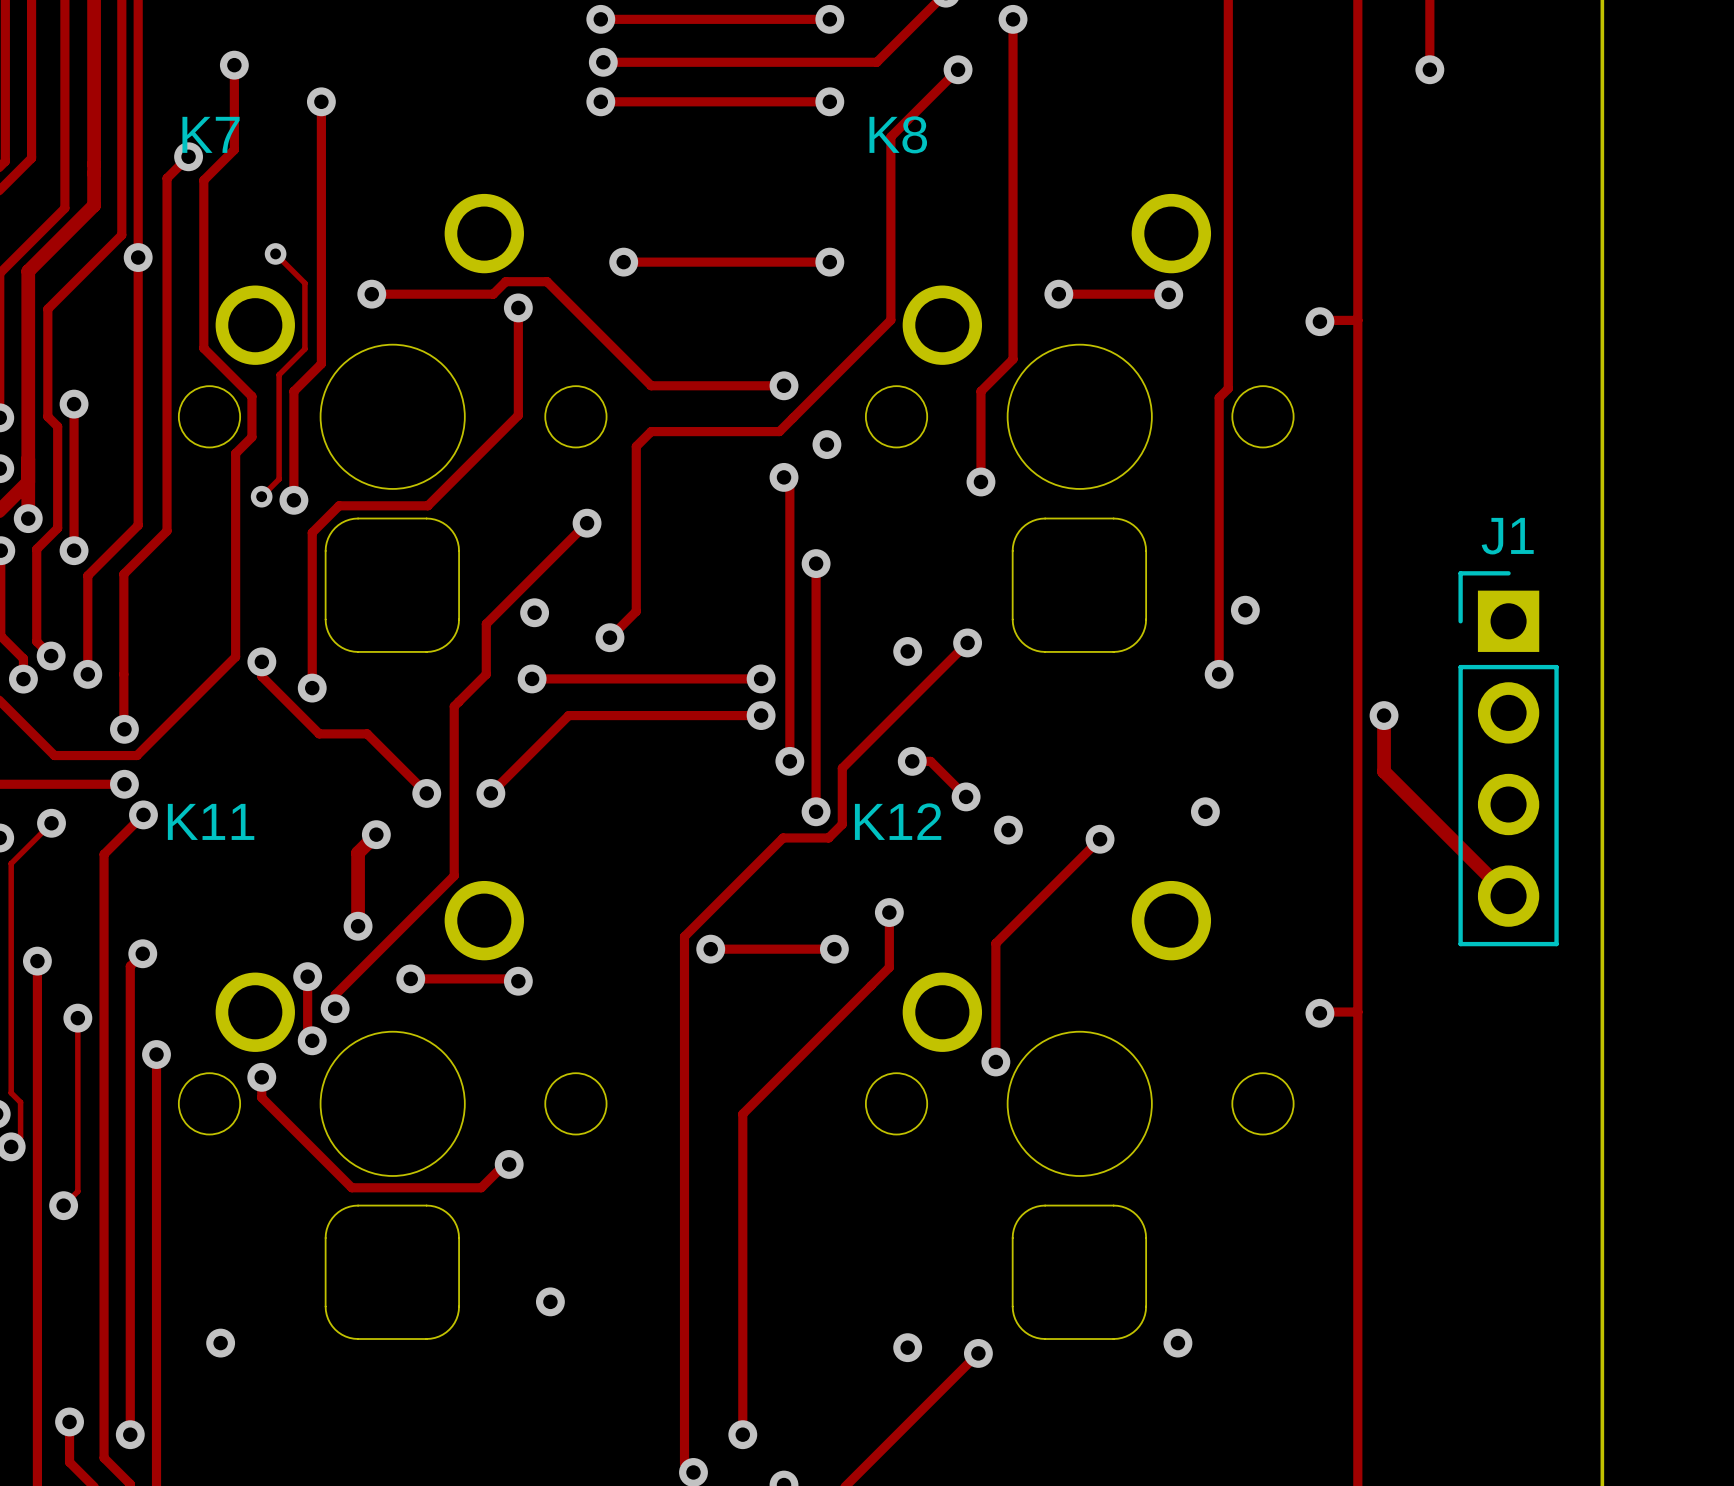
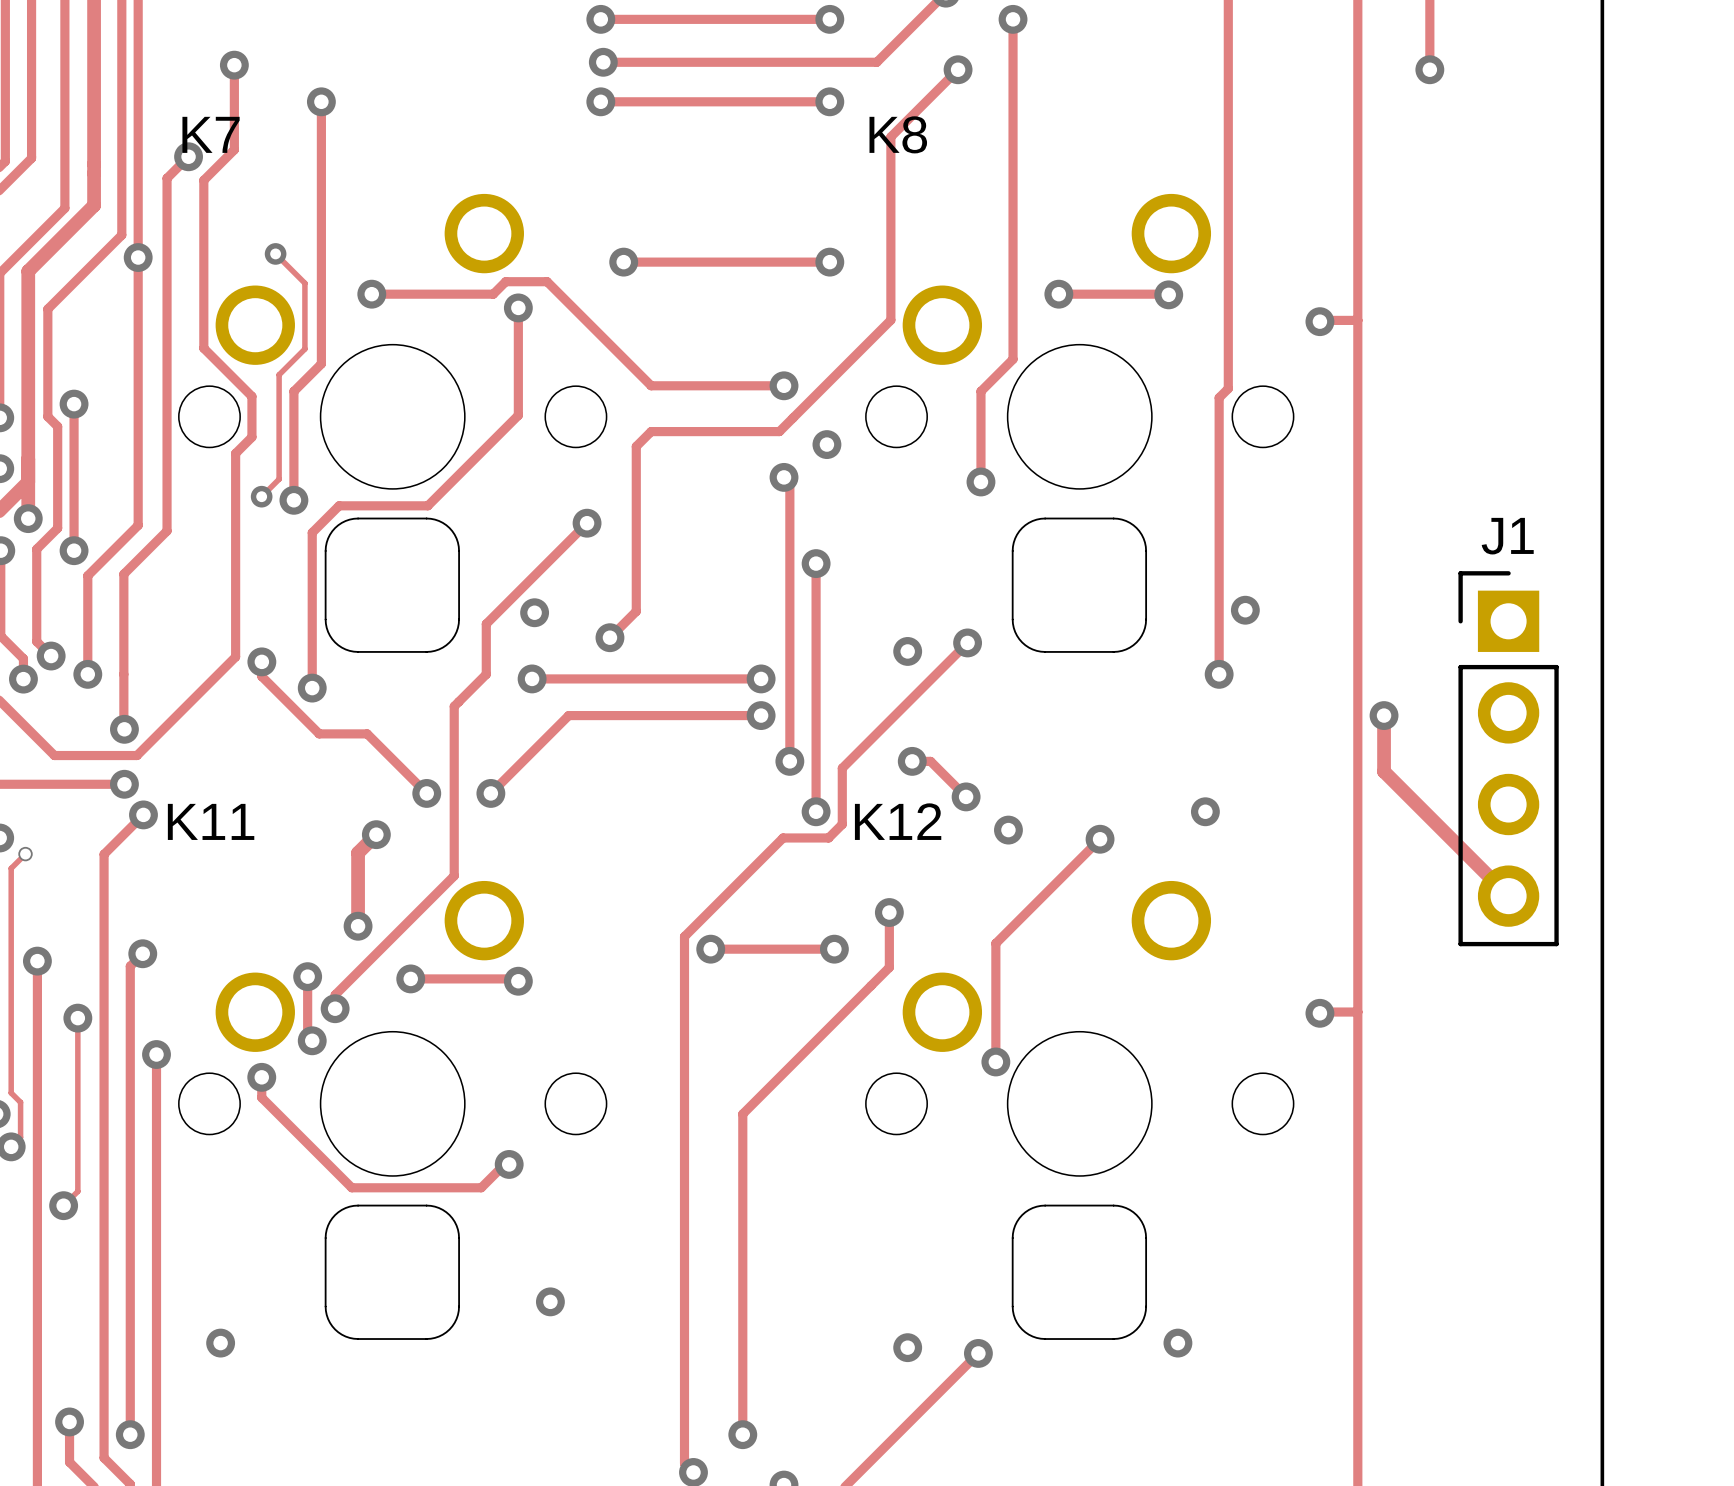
track: (51, 823) (11, 863) (11, 868) -> (25, 854) (11, 868)
via: (51, 823) -> none
via: none -> (25, 854)

